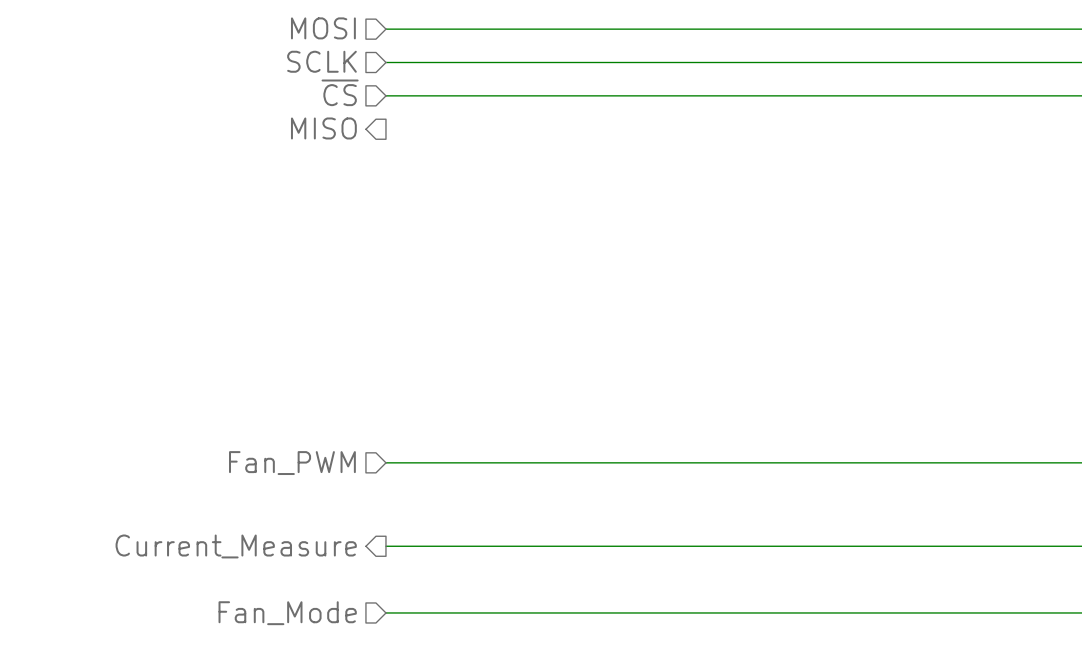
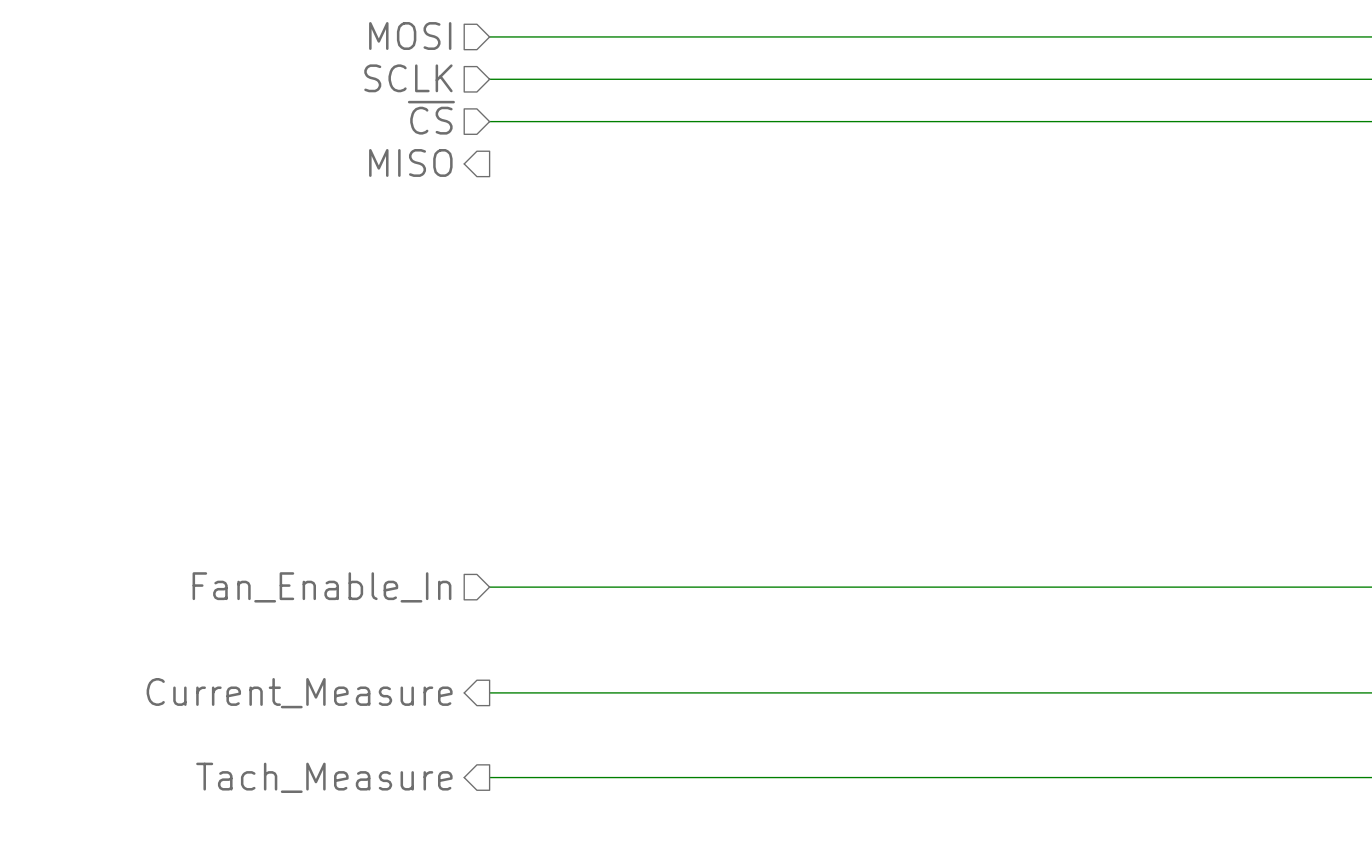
hierarchical label: Fan_PWM (292, 463) -> Fan_Enable_In (321, 587)
hierarchical label shape: input (287, 613) -> output (324, 777)
hierarchical label: Fan_Mode (287, 613) -> Tach_Measure (324, 777)

